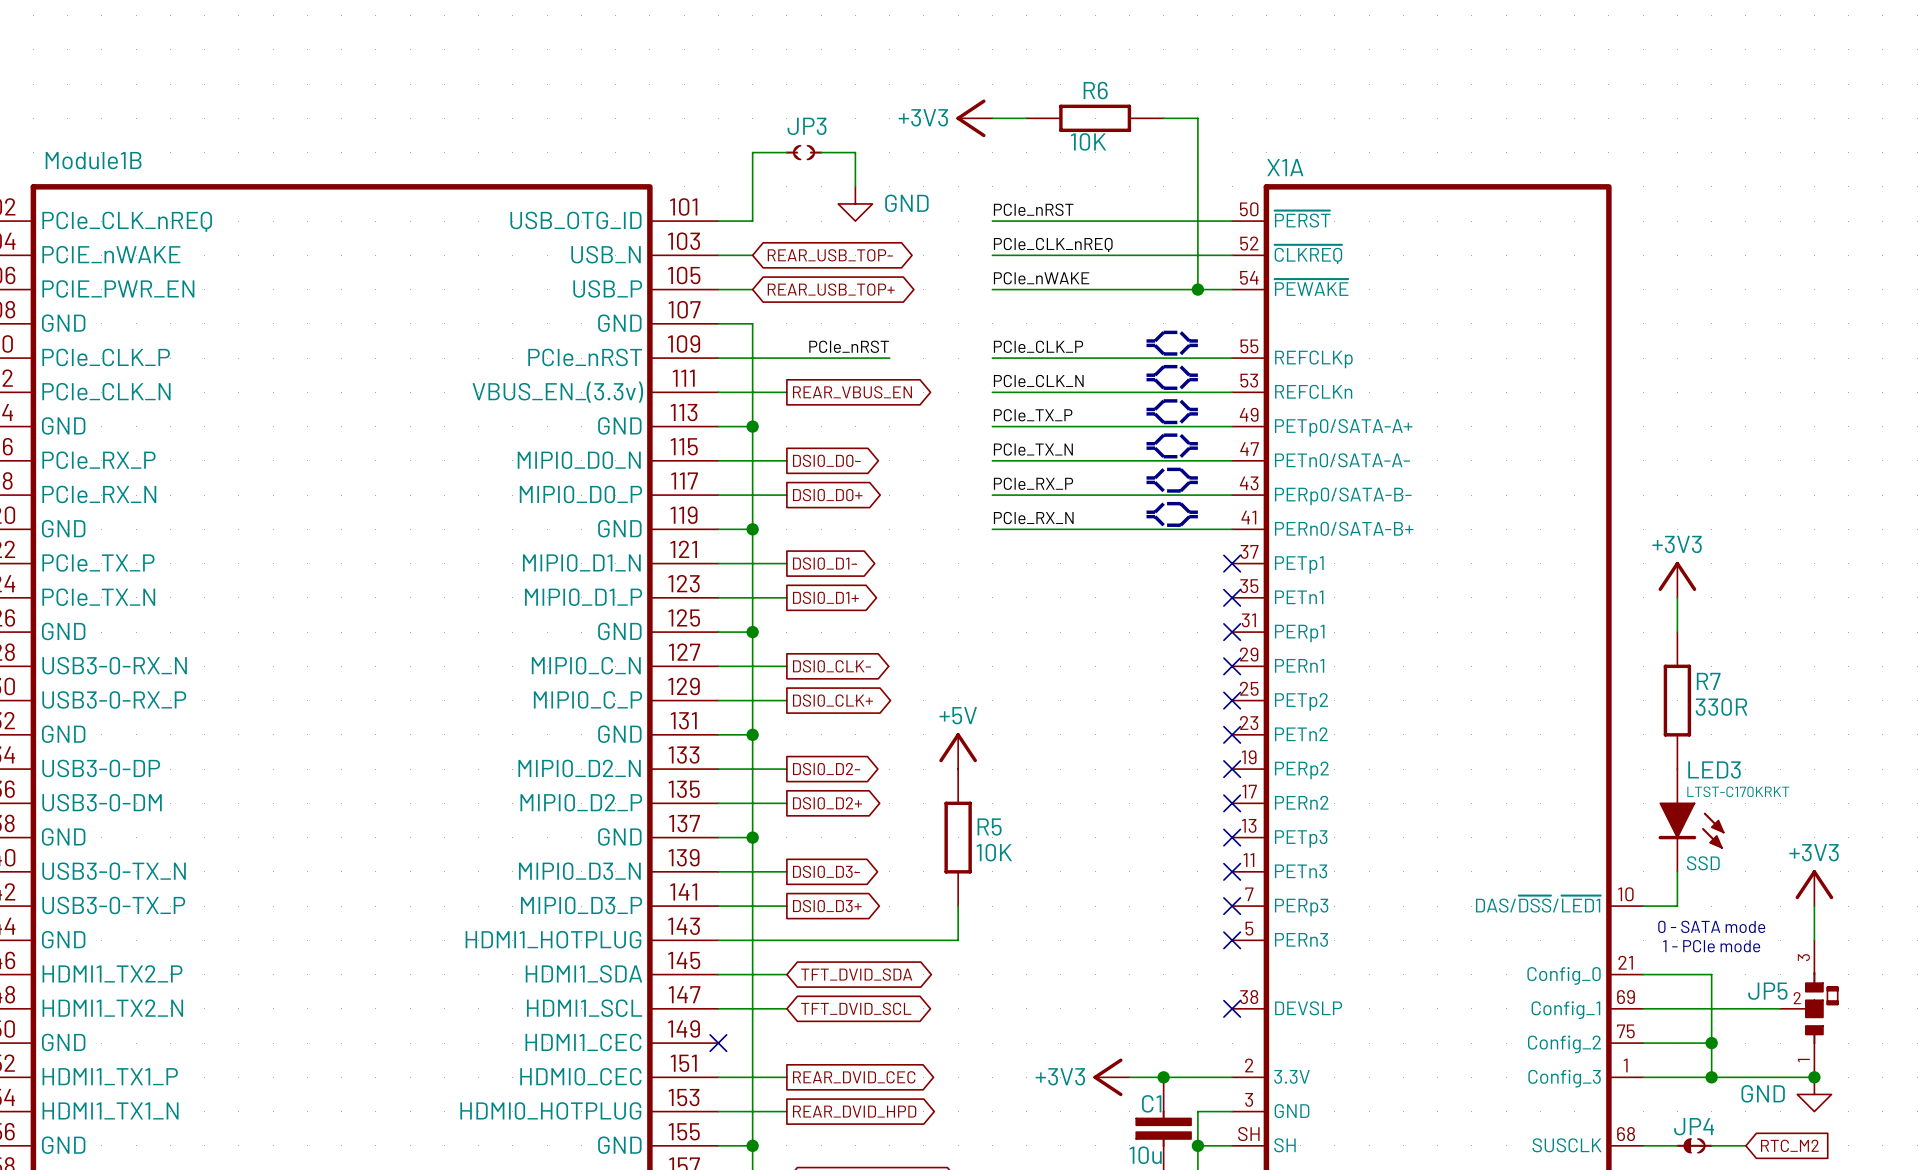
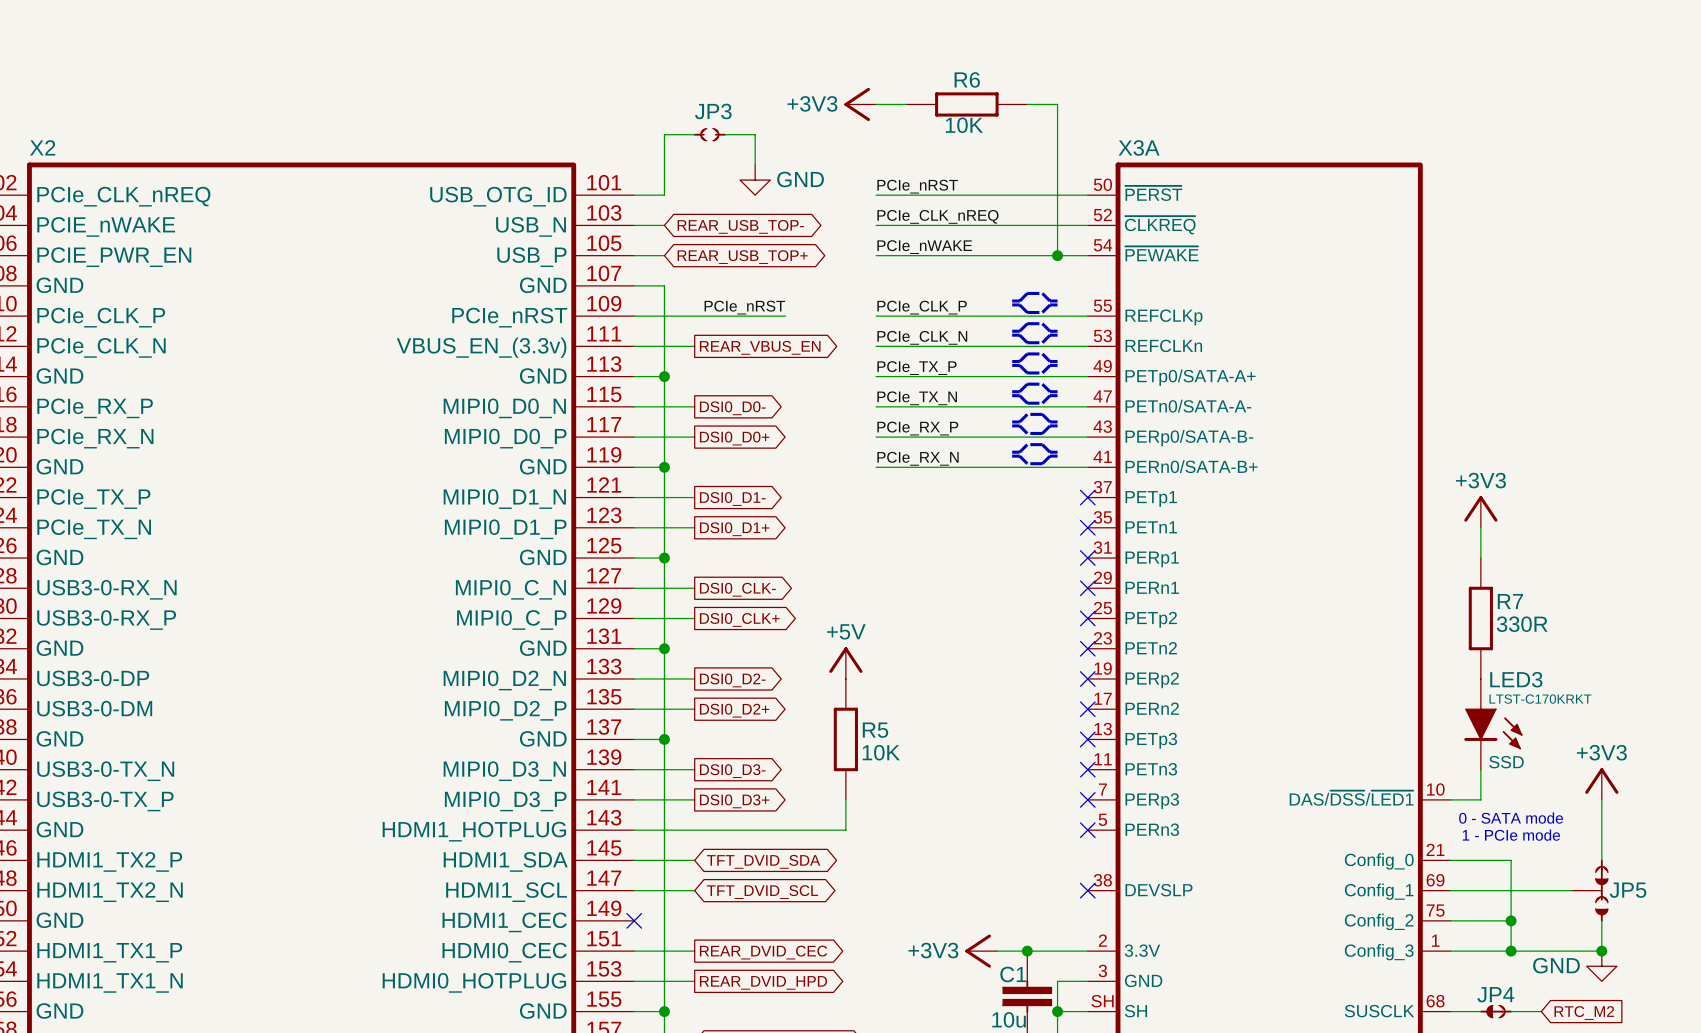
Module1B name: Module1B (93, 160) -> X2 (42, 147)
X1A name: X1A (1285, 167) -> X3A (1139, 147)
JP5 symbol: [1780, 940, 1838, 1078] -> [1571, 859, 1608, 922]
JP5 name position: JP5 (1767, 991) -> JP5 (1628, 890)

